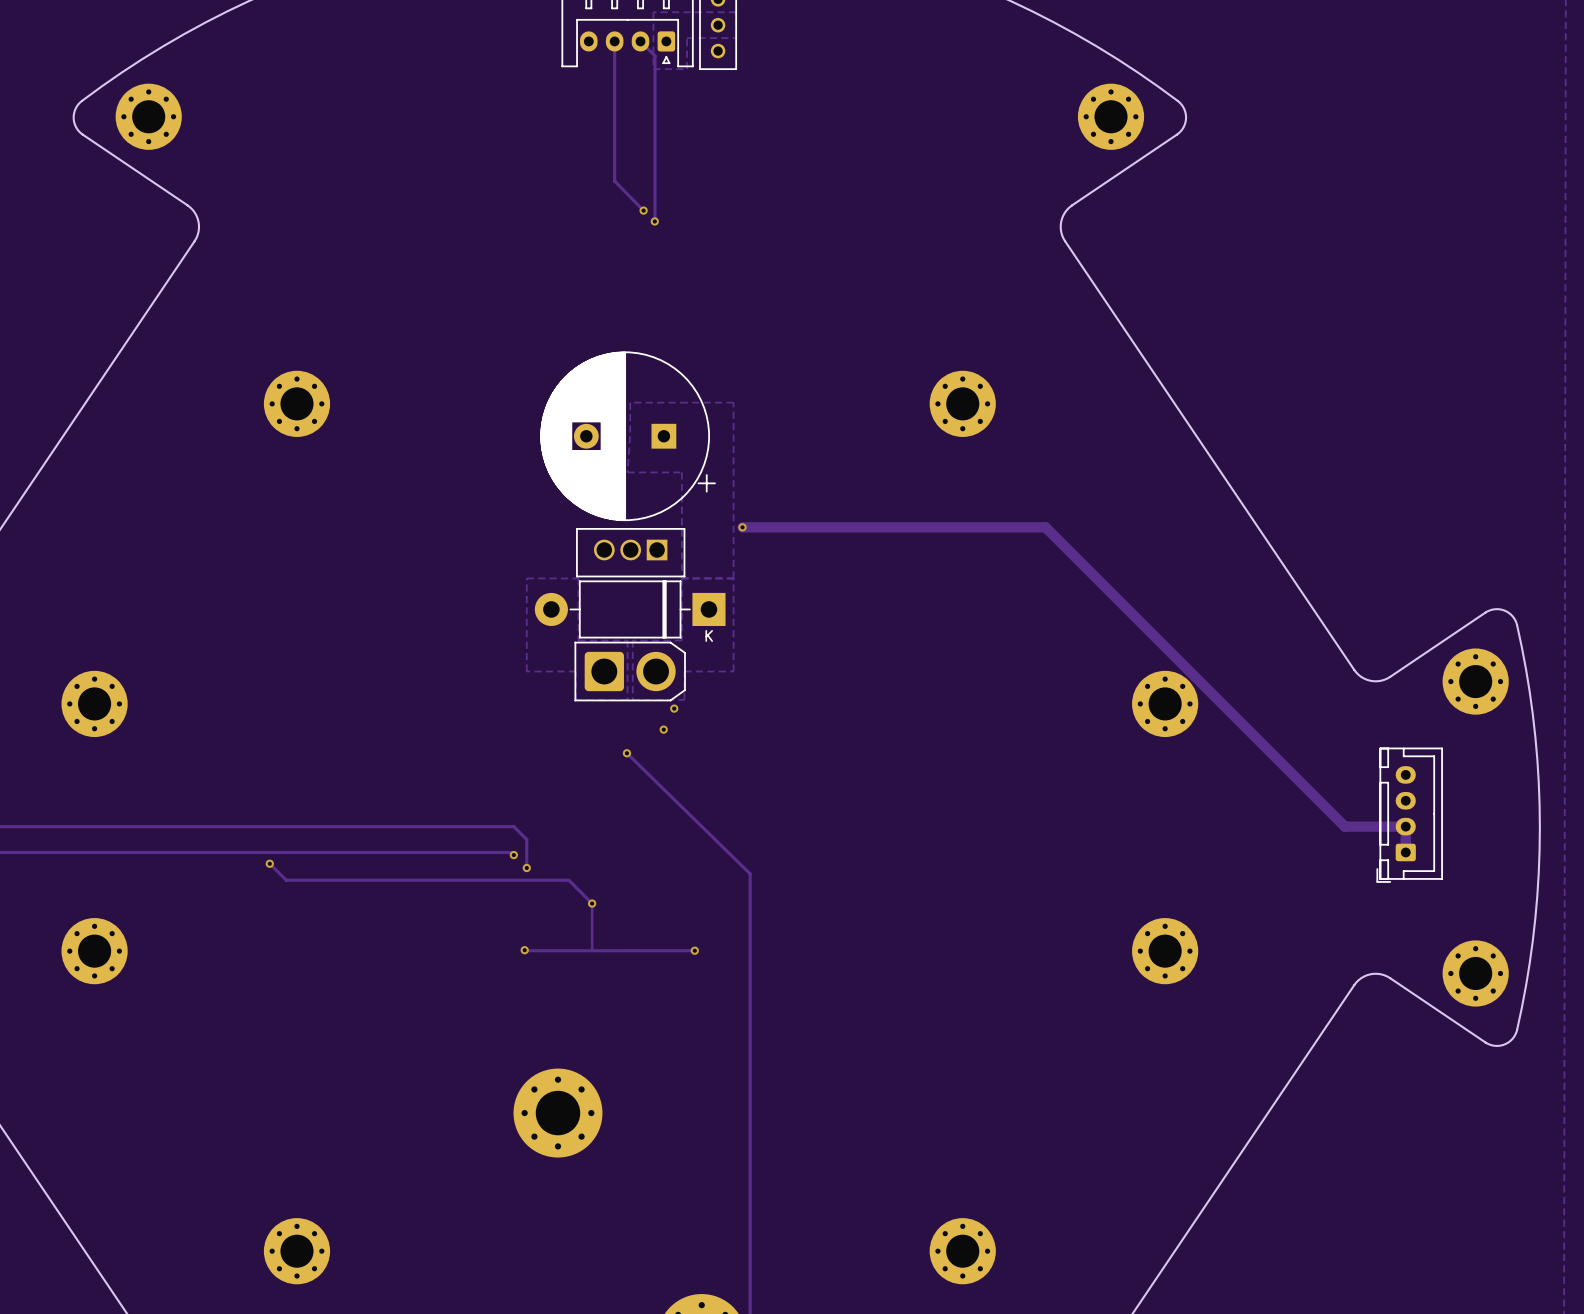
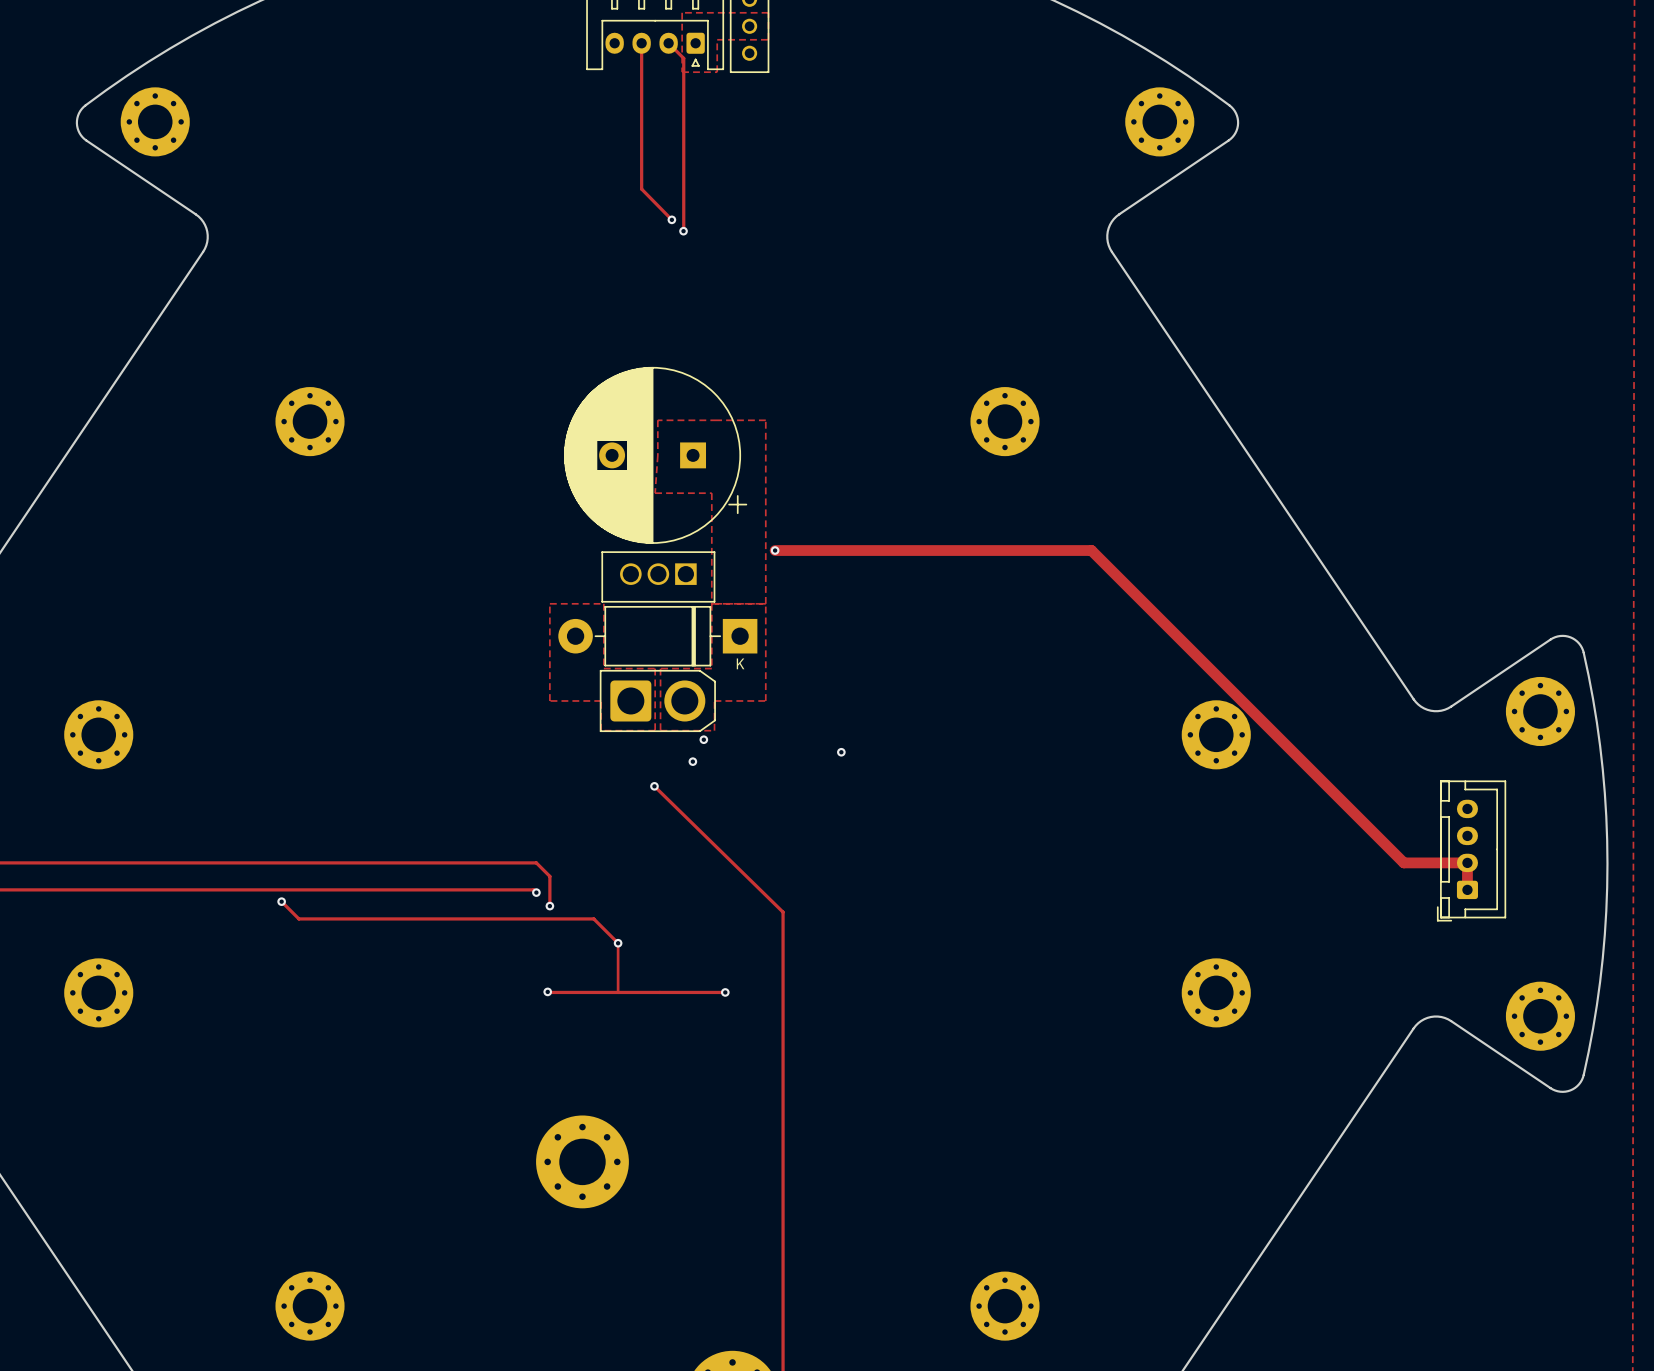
via: none -> (841, 752)

